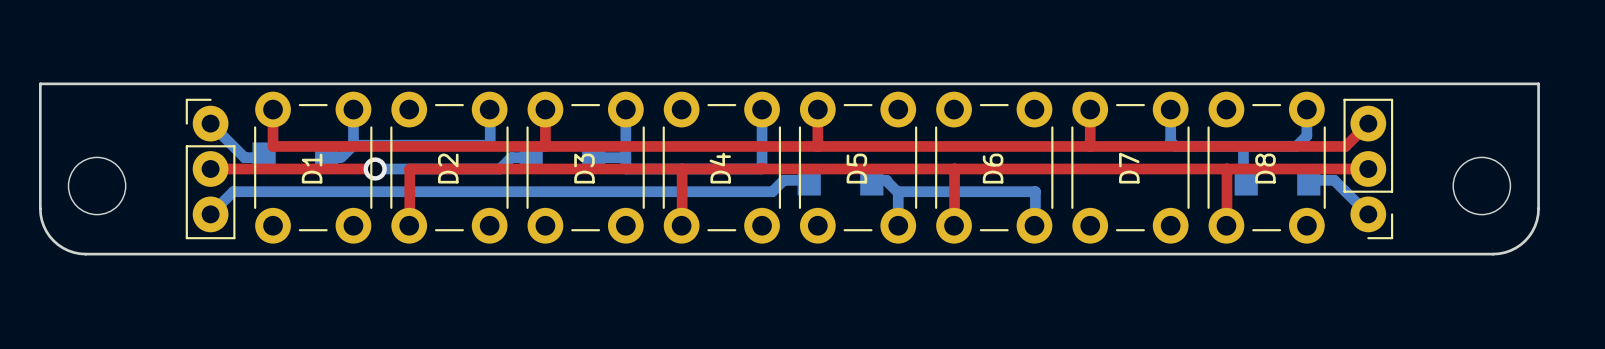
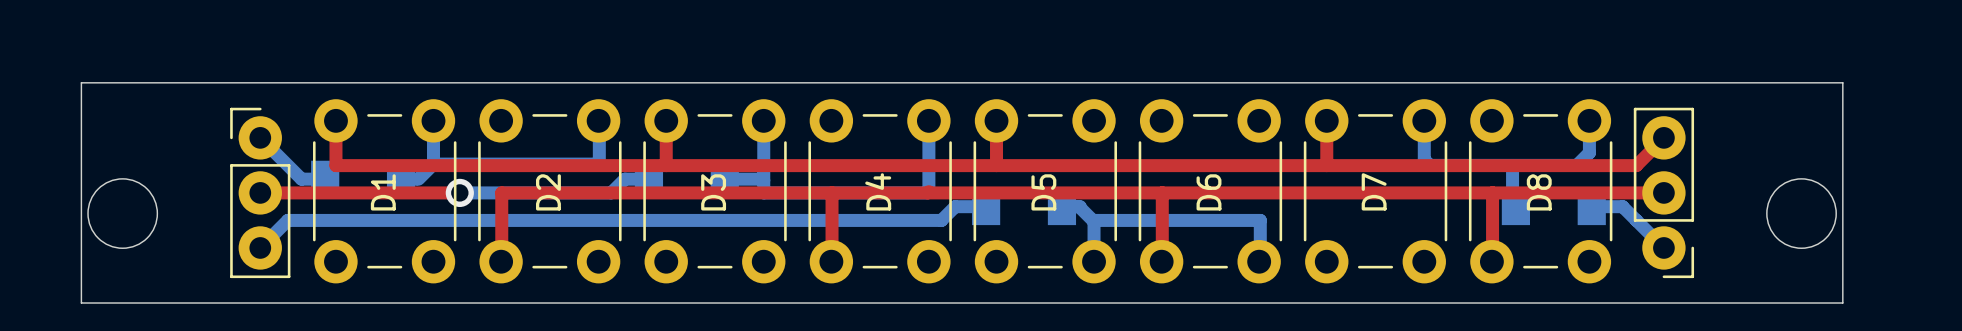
board edge: (40, 83) (41, 220) (46, 231) (53, 240) (63, 248) (79, 253) (1493, 254) (1510, 250) (1525, 240) (1532, 231) (1538, 214) (1538, 83) (40, 83) -> (81, 82) (81, 303) (1842, 303) (1842, 82) (81, 82)

